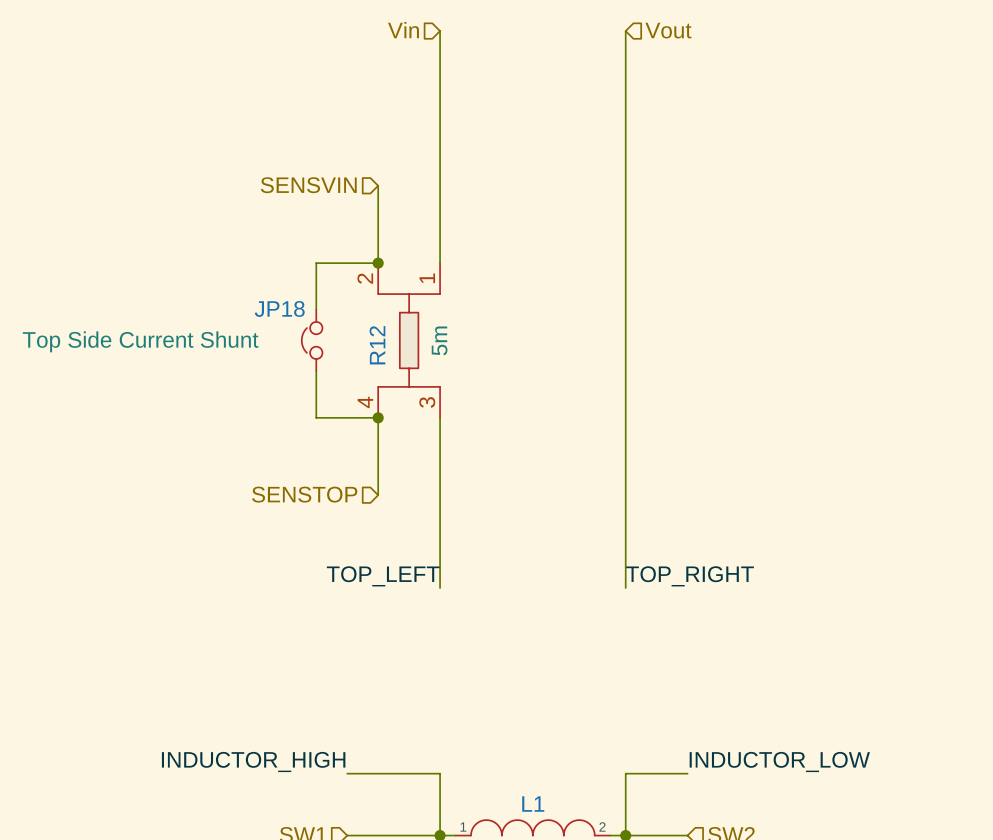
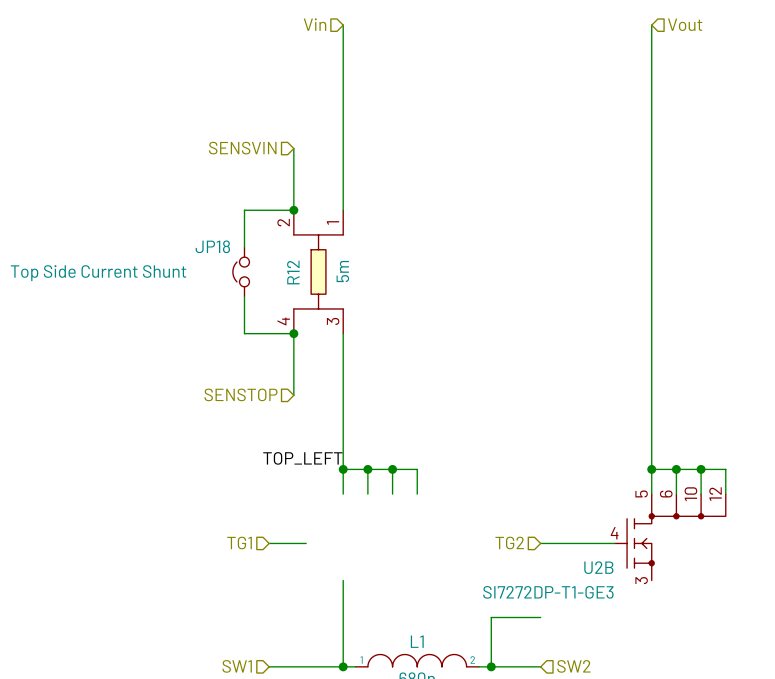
hierarchical label position: Vout (668, 30) -> Vout (685, 24)
wire: (625, 31) (625, 588) -> none
wire: none -> (651, 25) (651, 494)
label: TOP_RIGHT (690, 576) -> none
junction: none -> (343, 469)
wire: none -> (367, 469) (367, 494)
junction: none -> (367, 469)
wire: none -> (392, 469) (392, 494)
junction: none -> (392, 469)
wire: none -> (651, 469) (725, 469) (725, 494)
junction: none -> (651, 469)
wire: none -> (676, 469) (676, 494)
junction: none -> (676, 469)
wire: none -> (701, 469) (701, 494)
junction: none -> (701, 469)
wire: none -> (343, 494) (343, 469) (417, 469) (417, 494)
U2B: none -> SI7272DP-T1-GE3 (670, 537)
hierarchical label: none -> TG1 (239, 542)
wire: none -> (269, 543) (306, 543)
hierarchical label: none -> TG2 (509, 542)
wire: none -> (540, 543) (614, 543)
label: INDUCTOR_HIGH (253, 761) -> none
label: INDUCTOR_LOW (779, 761) -> none
wire: (347, 773) (440, 773) -> (343, 580) (343, 617)

